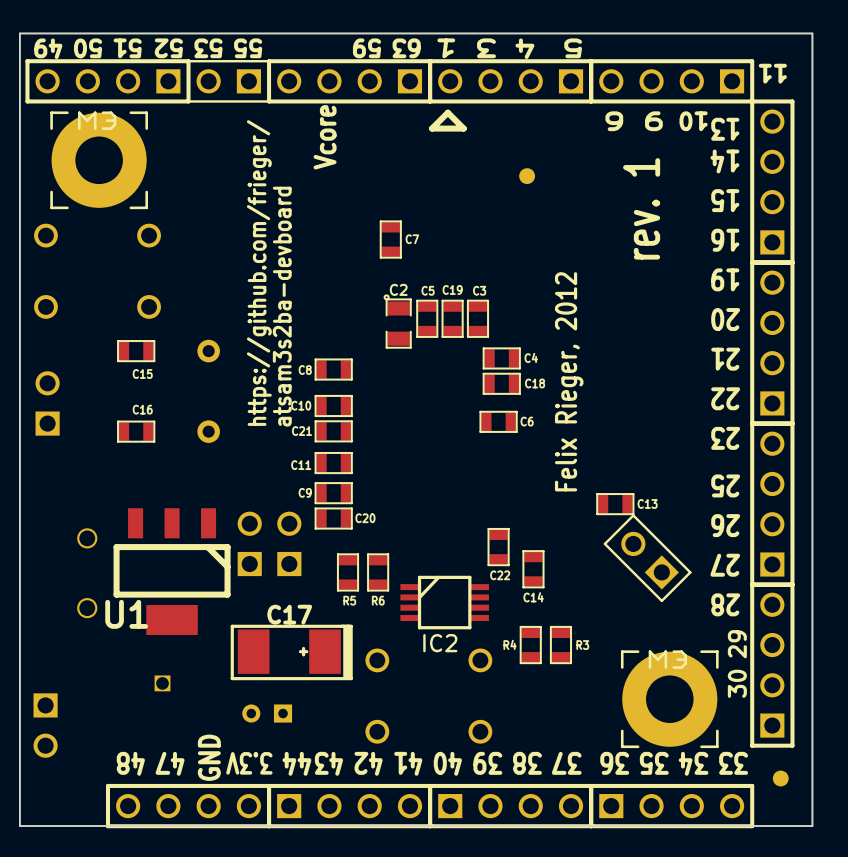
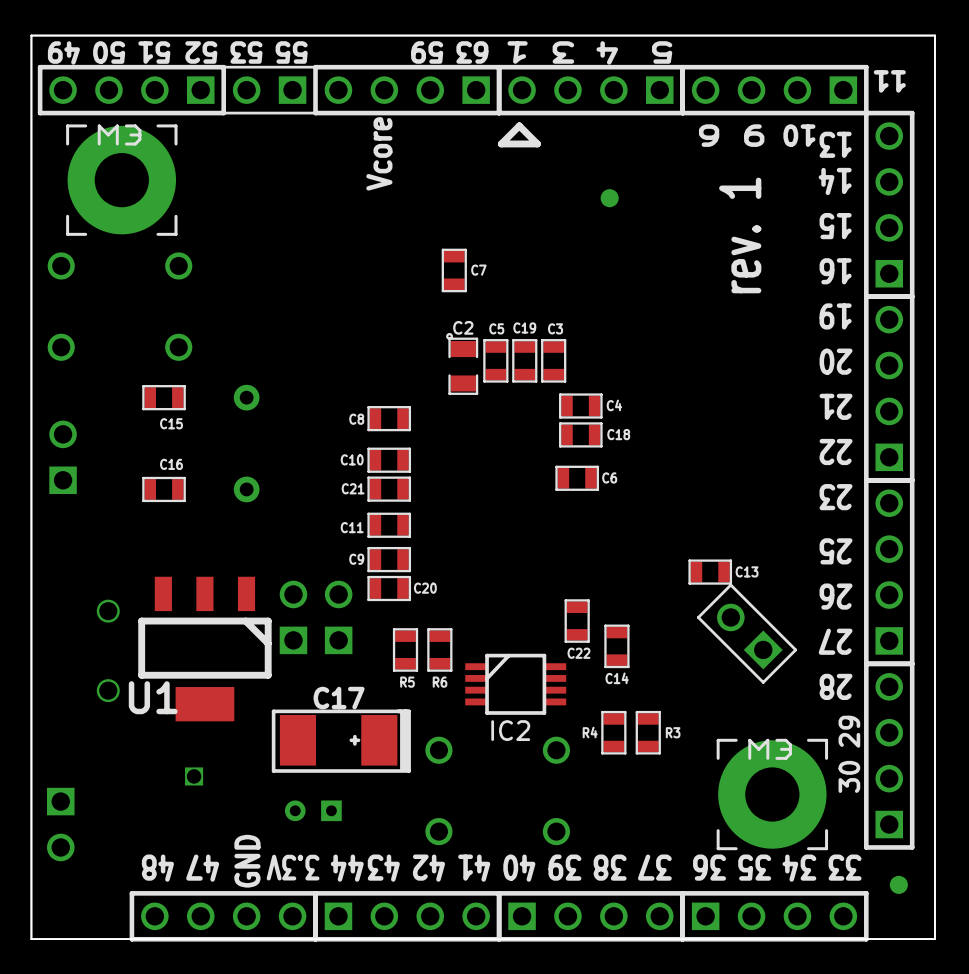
text: https://github.com/frieger/ (259, 273) -> none
text: atsam3s2ba-devboard (282, 306) -> none
text: Felix Rieger, 2012 (569, 381) -> none

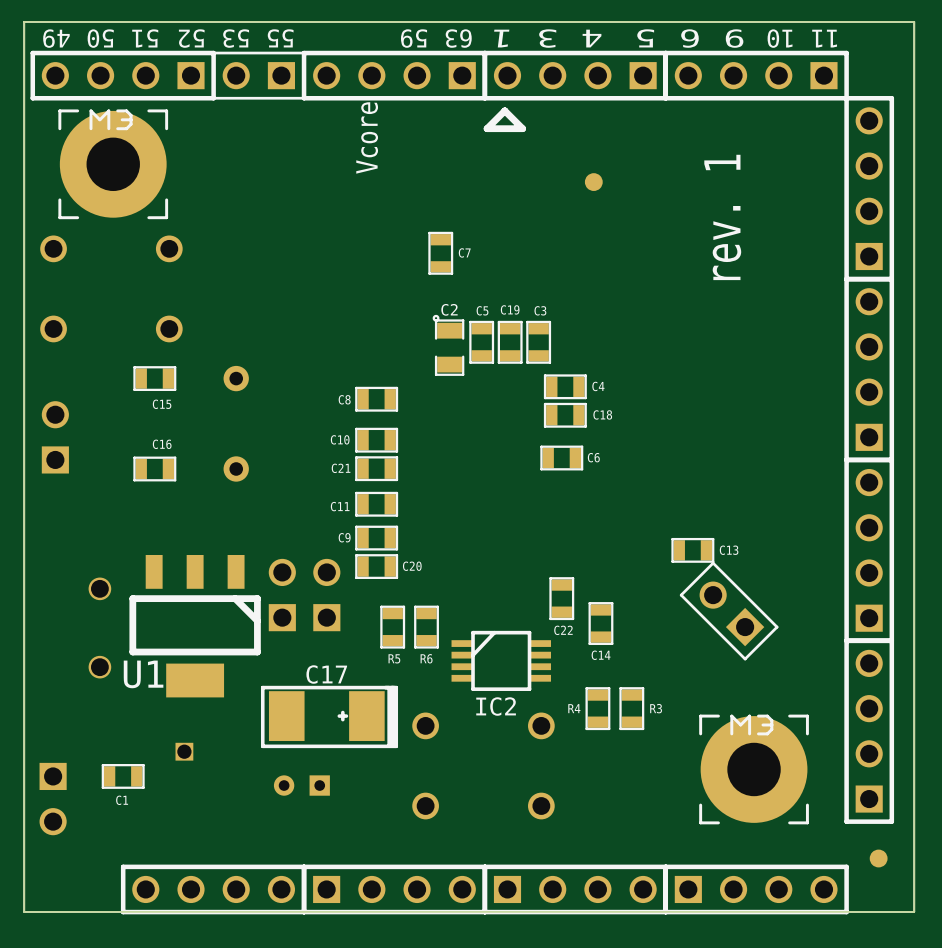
text position: 11 (889, 81) -> 11 (824, 38)
text position: 6 (709, 135) -> 6 (689, 38)
text position: 9 (754, 135) -> 9 (734, 38)
text position: 10 (799, 135) -> 10 (780, 38)
text: 13 (835, 144) -> none
text: 14 (835, 181) -> none
text: 15 (835, 226) -> none
text: 16 (835, 271) -> none
text: 19 (835, 316) -> none
text: 20 (836, 361) -> none
text: 21 (836, 406) -> none
text: 22 (836, 451) -> none
text: 23 (836, 497) -> none
text: 25 (836, 551) -> none
text: 26 (836, 596) -> none
text: 27 (835, 641) -> none
text: 28 (836, 686) -> none
text: 29 (849, 731) -> none
text: 30 (849, 776) -> none
C1: none -> (123, 776)
text: GND (247, 861) -> none
text: 3.3V (293, 867) -> none
text: 39 (564, 867) -> none
text: 38 (610, 867) -> none
text: 37 (654, 867) -> none
text: 36 (709, 867) -> none
text: 35 (754, 867) -> none
text: 33 (845, 867) -> none
text: 48 (157, 868) -> none
text: 47 (202, 868) -> none
text: 44 (347, 868) -> none
text: 43 (383, 868) -> none
text: 42 (428, 868) -> none
text: 41 (474, 868) -> none
text: 40 (519, 868) -> none
text: 34 (799, 868) -> none

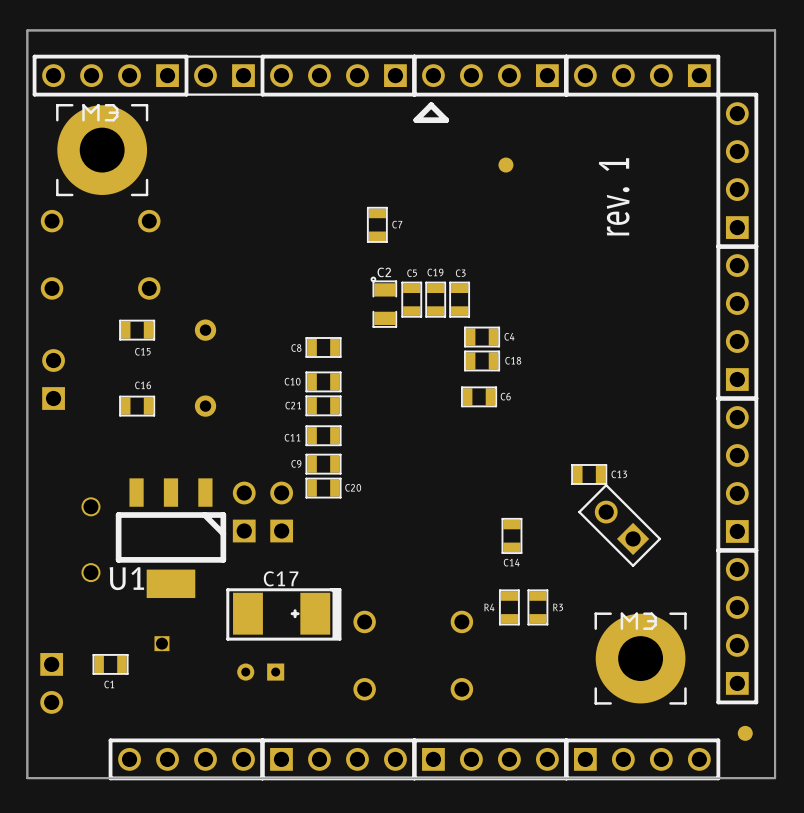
text: 49 (56, 38) -> none
text: 50 (100, 38) -> none
text: 51 (145, 38) -> none
text: 52 (191, 38) -> none
text: 53 (236, 38) -> none
text: 55 (280, 38) -> none
text: 59 (414, 38) -> none
text: 63 (458, 38) -> none
text: 1 (501, 38) -> none
text: 3 (547, 38) -> none
text: 4 (592, 38) -> none
text: 5 (645, 38) -> none
text: 6 (689, 38) -> none
text: 9 (734, 38) -> none
text: 10 (780, 38) -> none
text: 11 (824, 38) -> none
text: Vcore (367, 137) -> none
C22: (561, 598) -> none
R5: (392, 627) -> none
R6: (426, 627) -> none
IC2: (501, 660) -> none

